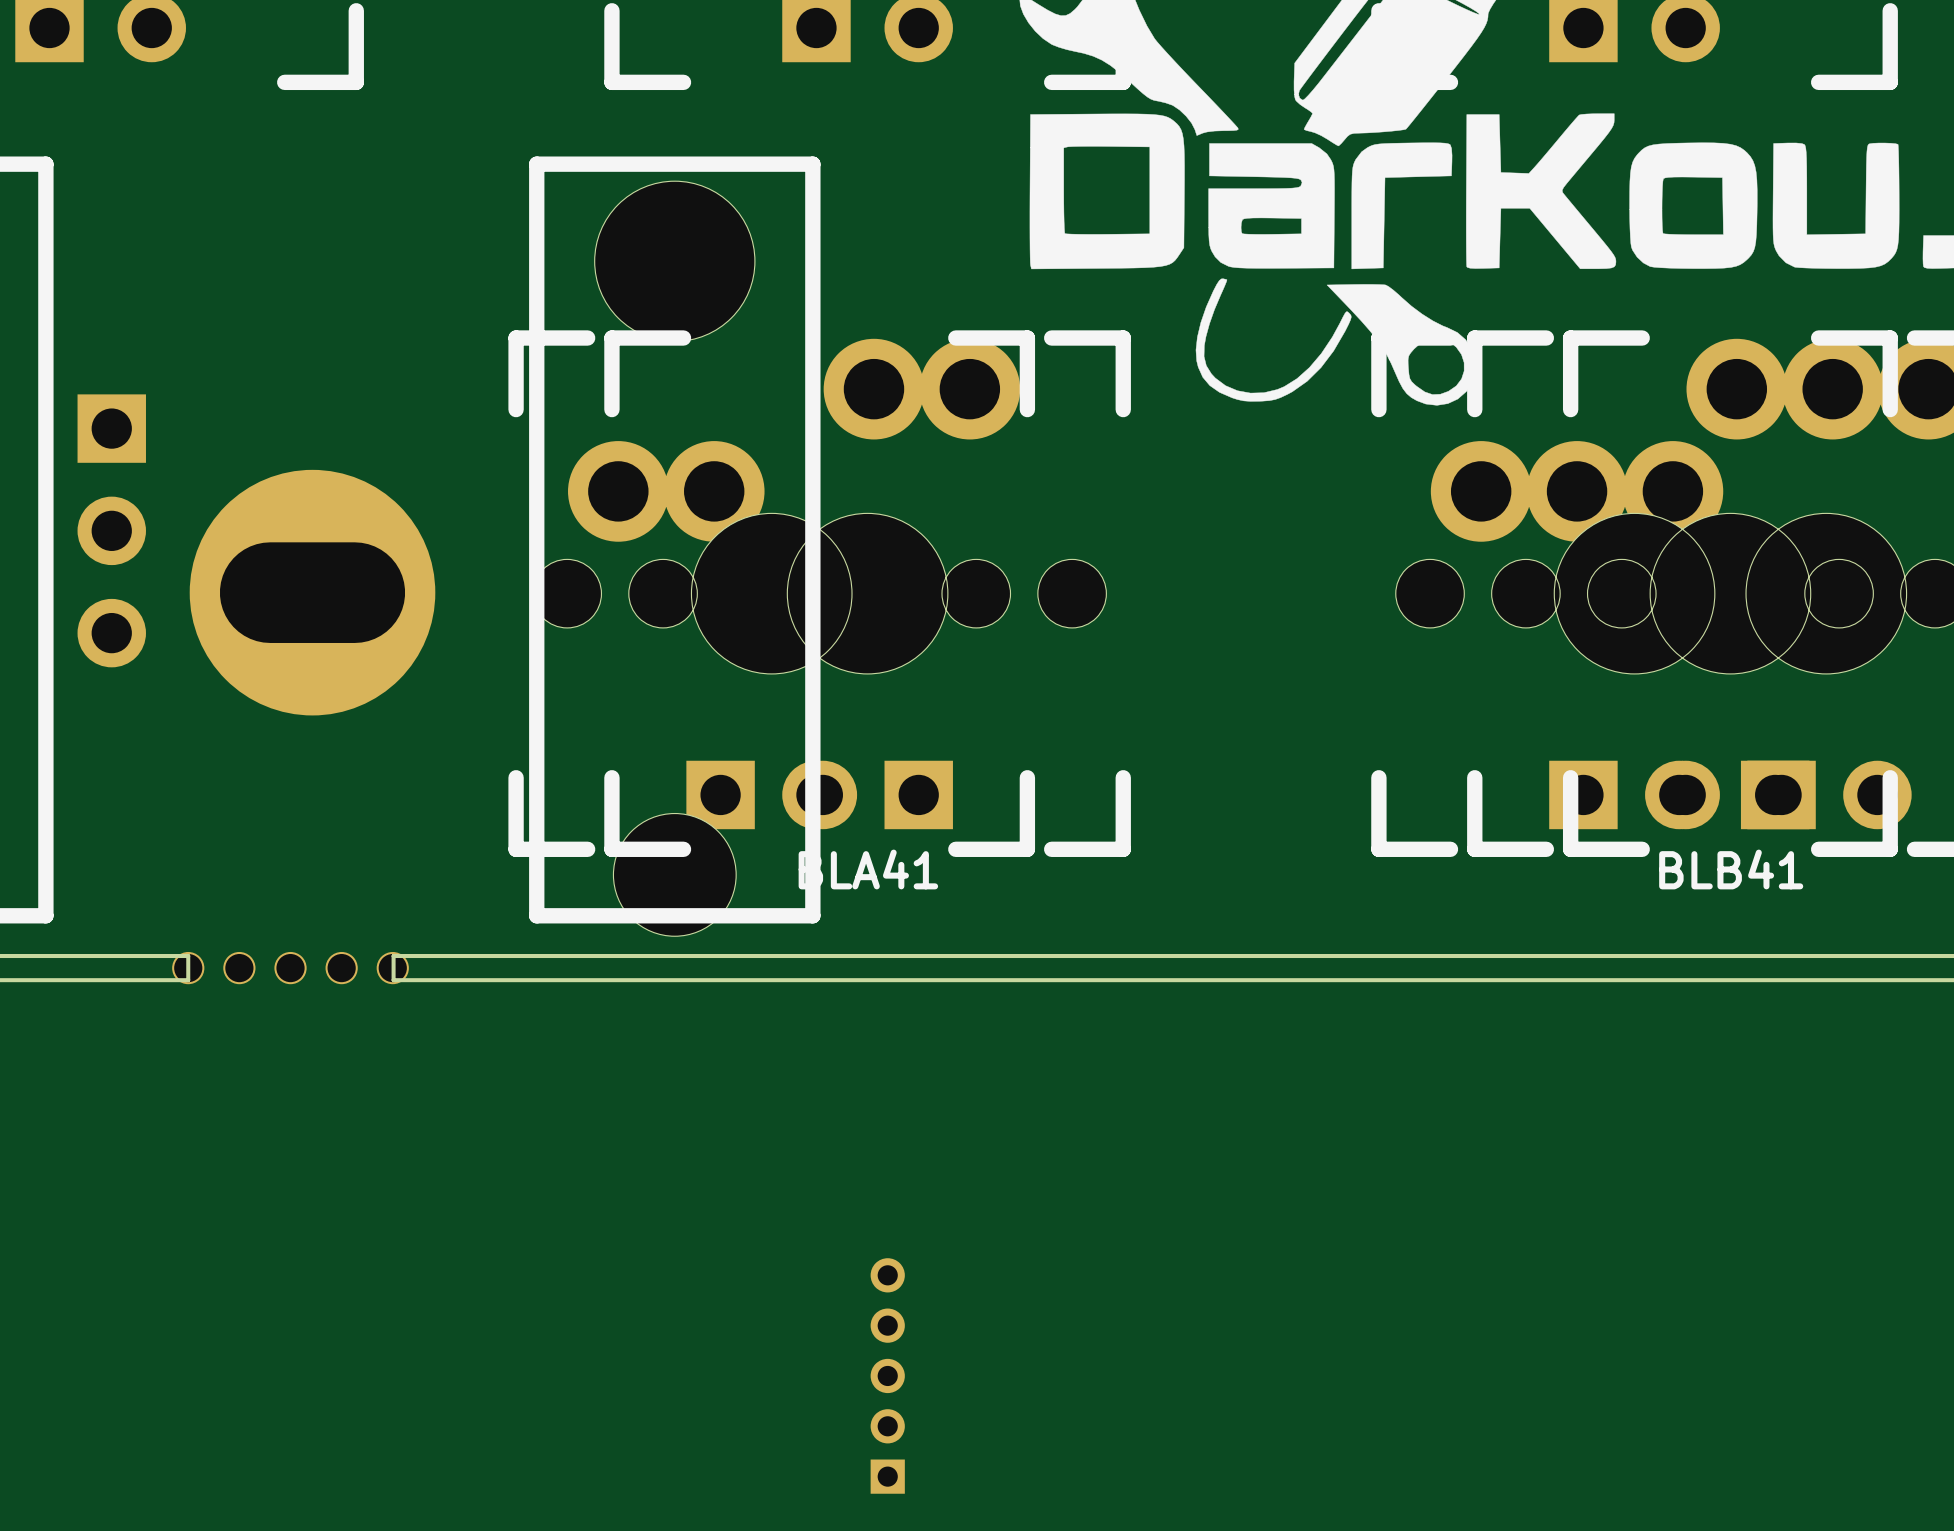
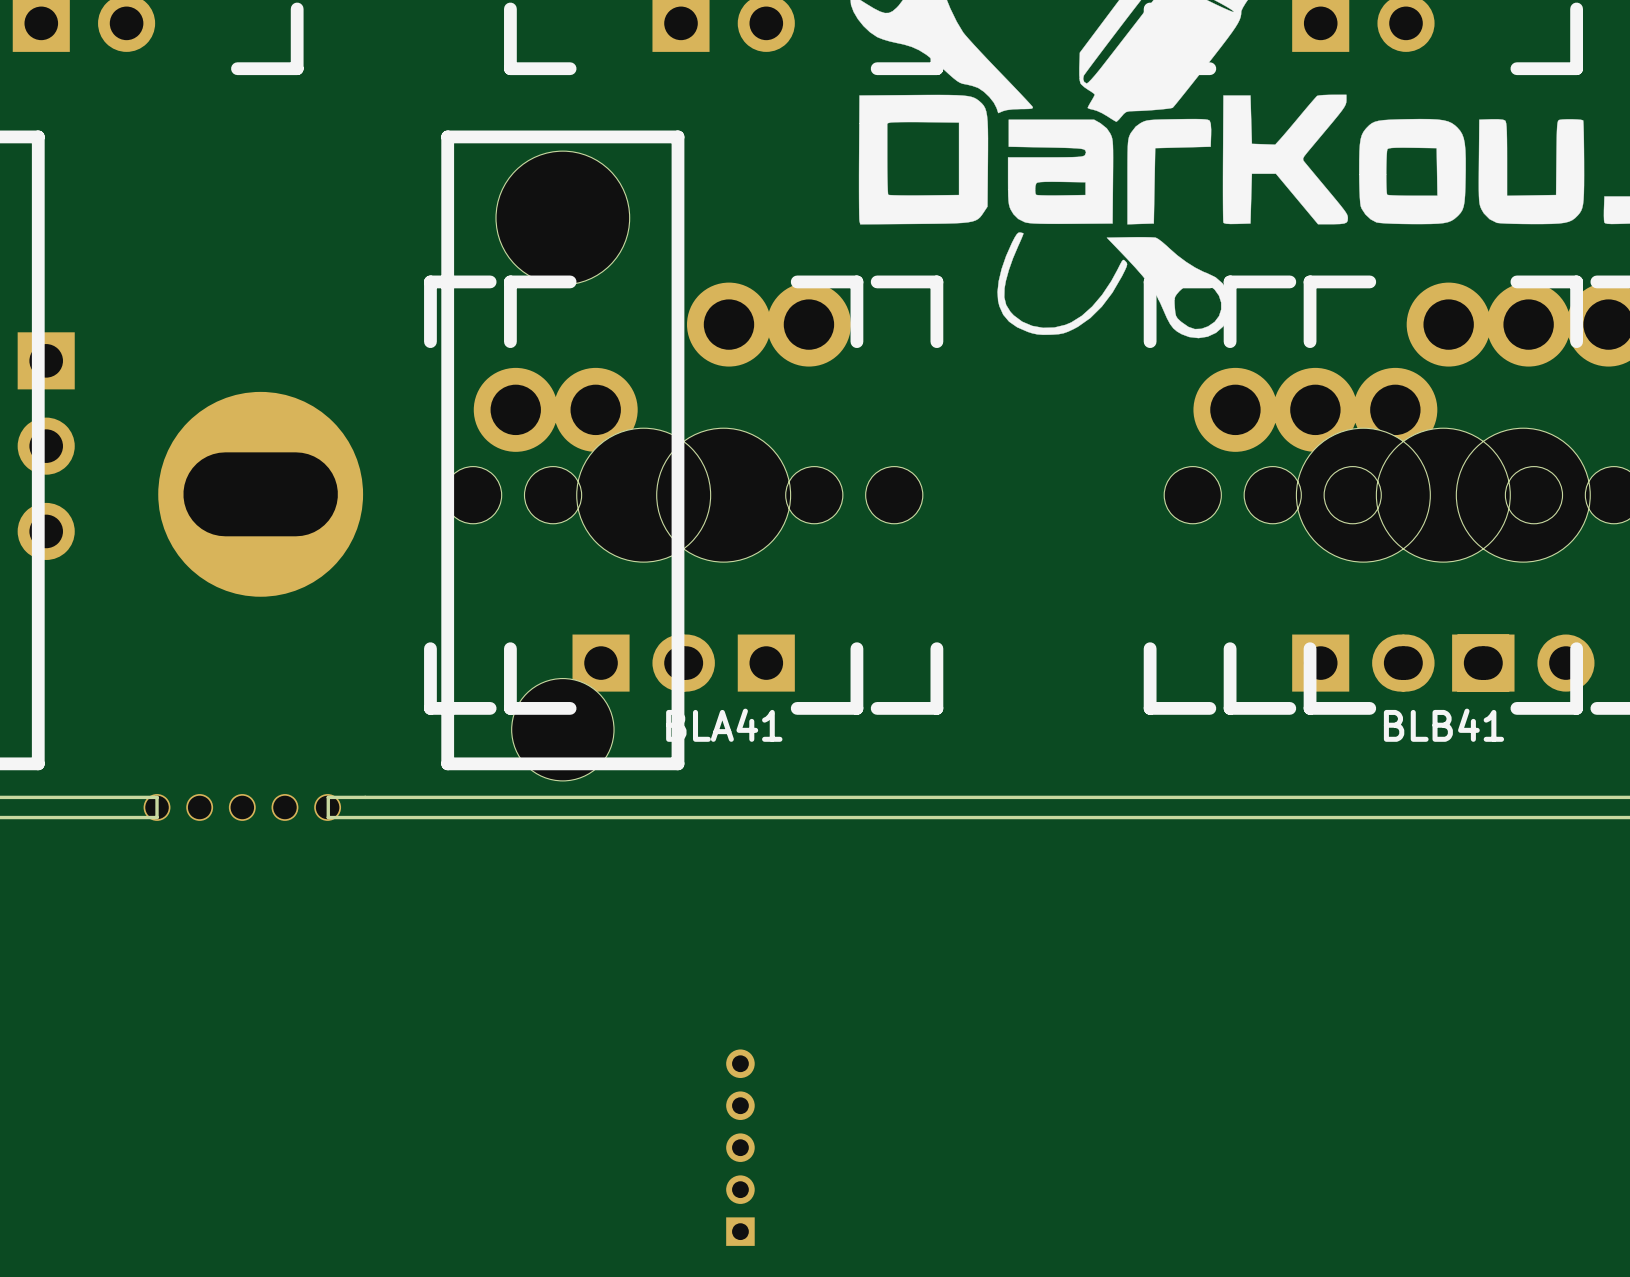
part position: (111, 530) -> (46, 446)

